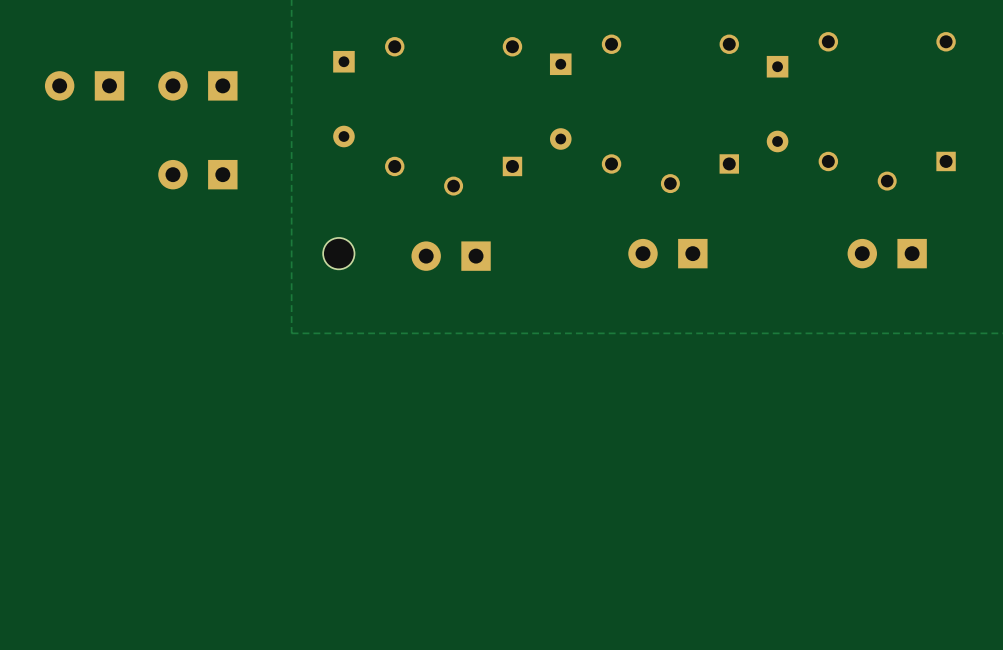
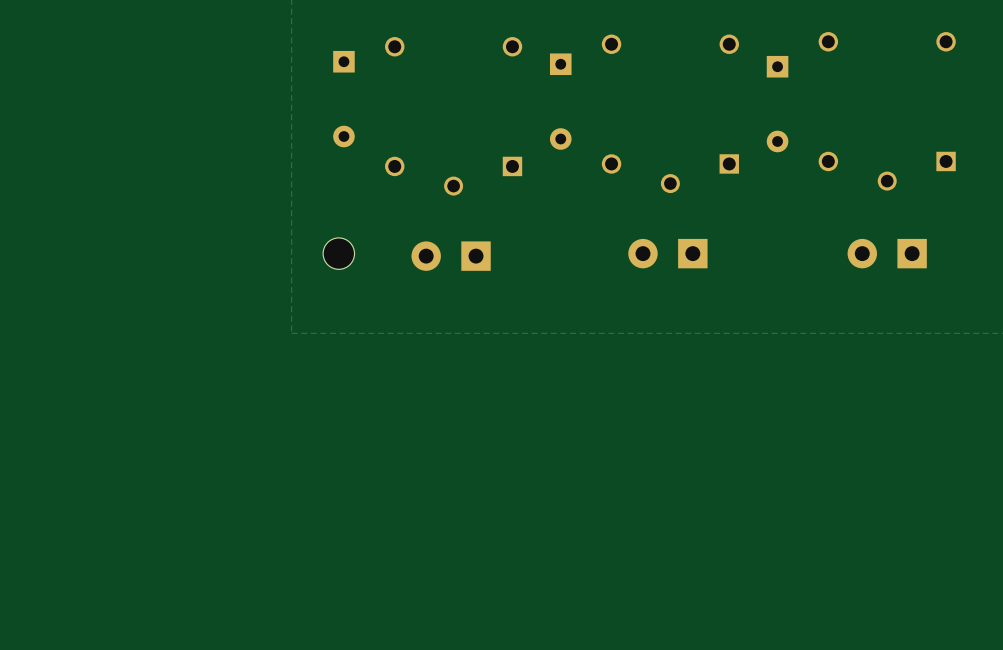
part: (84, 85) -> none
part: (197, 85) -> none
part: (197, 174) -> none

